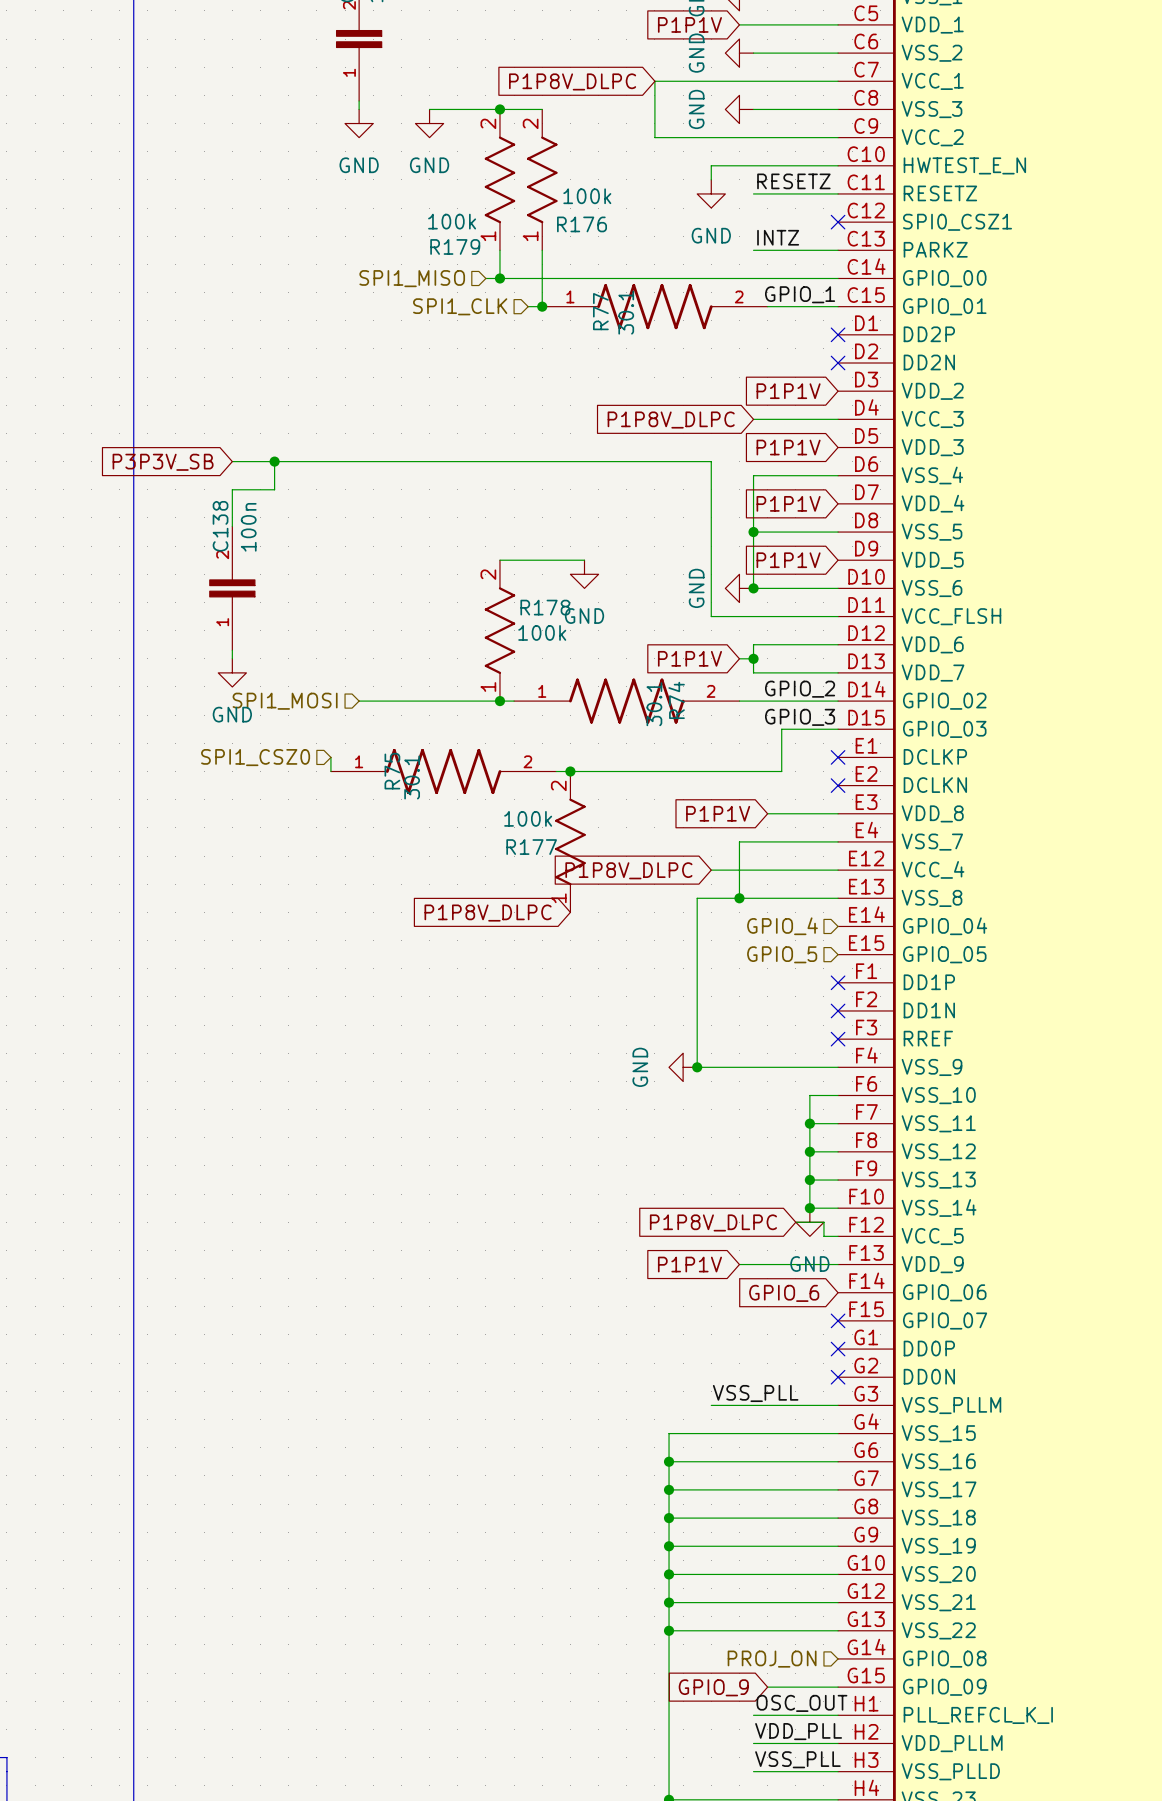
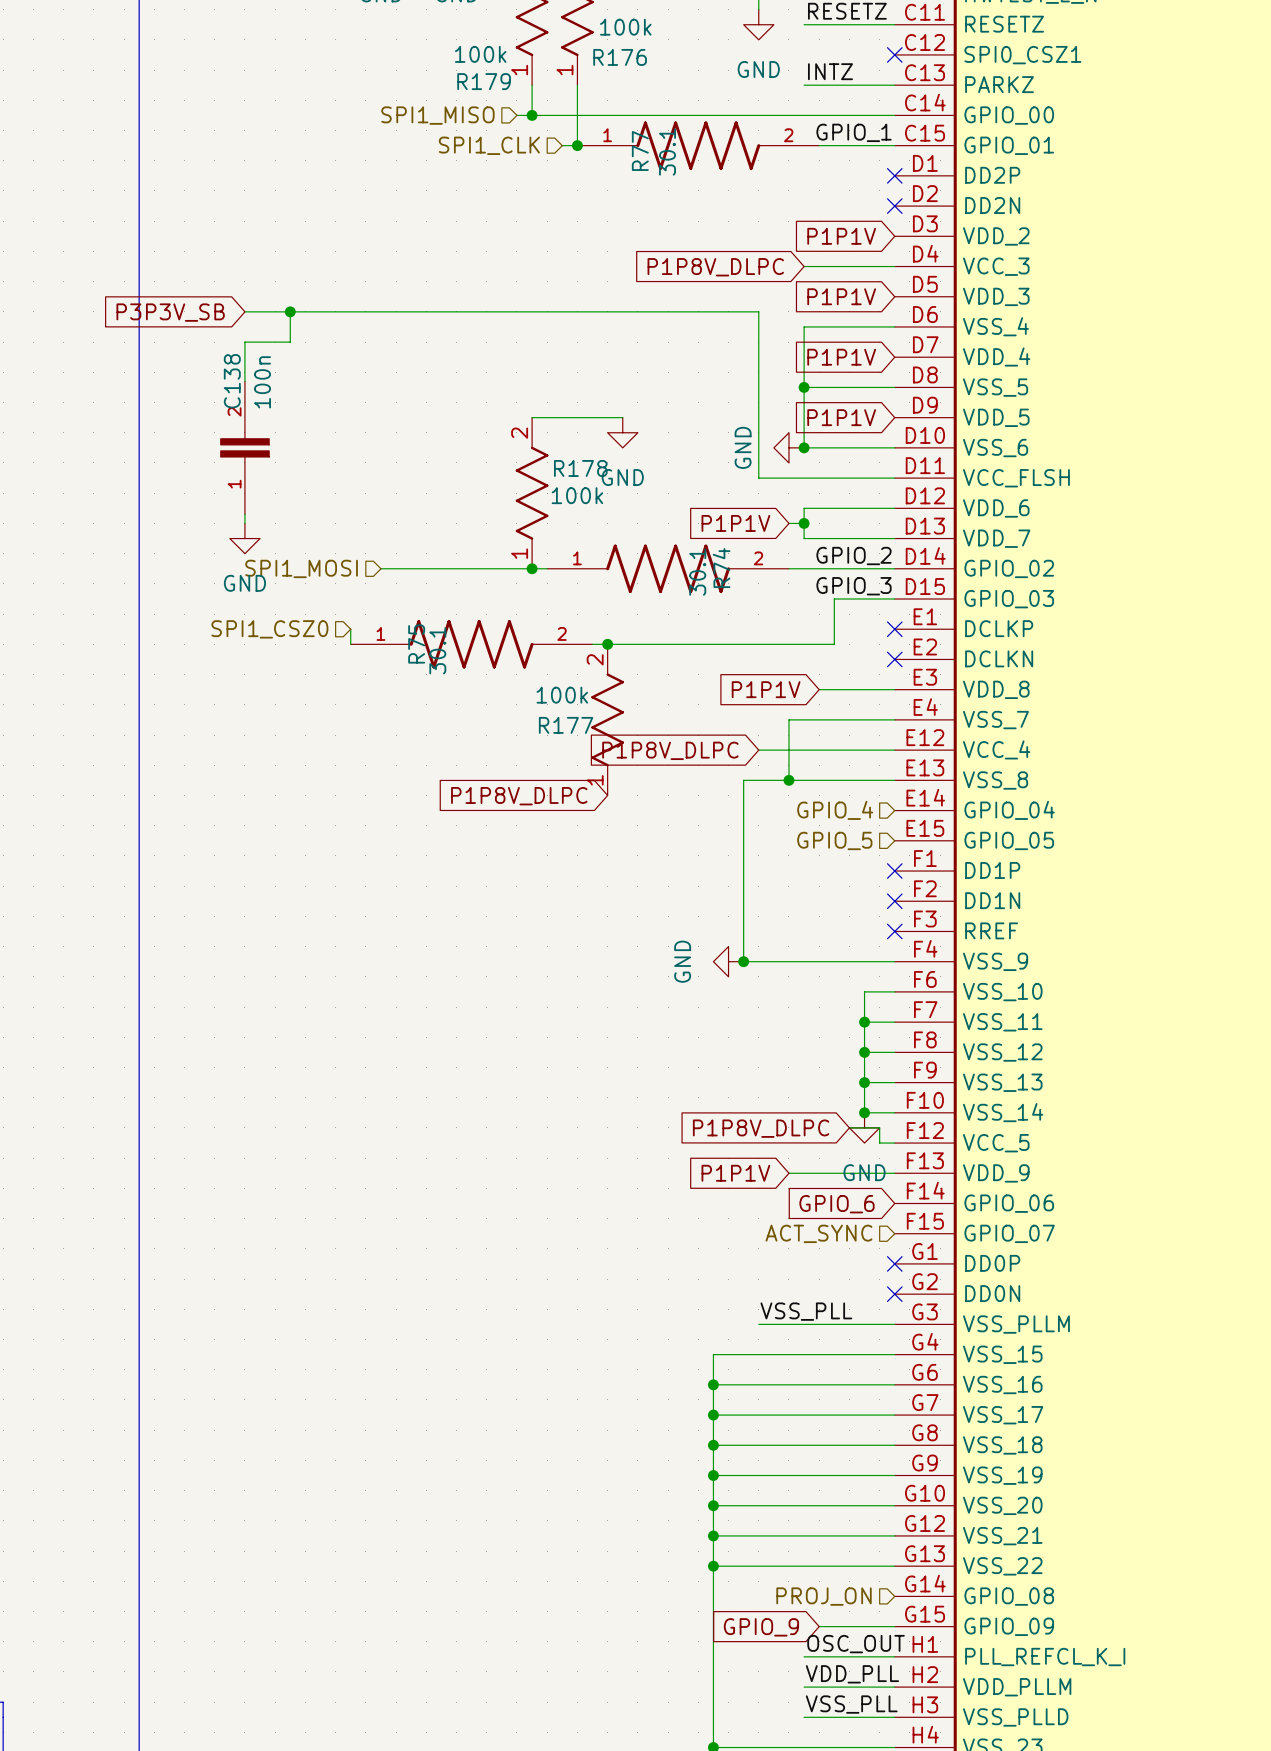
no-connect mark: (838, 1320) -> none
hierarchical label: none -> ACT_SYNC (818, 1233)

